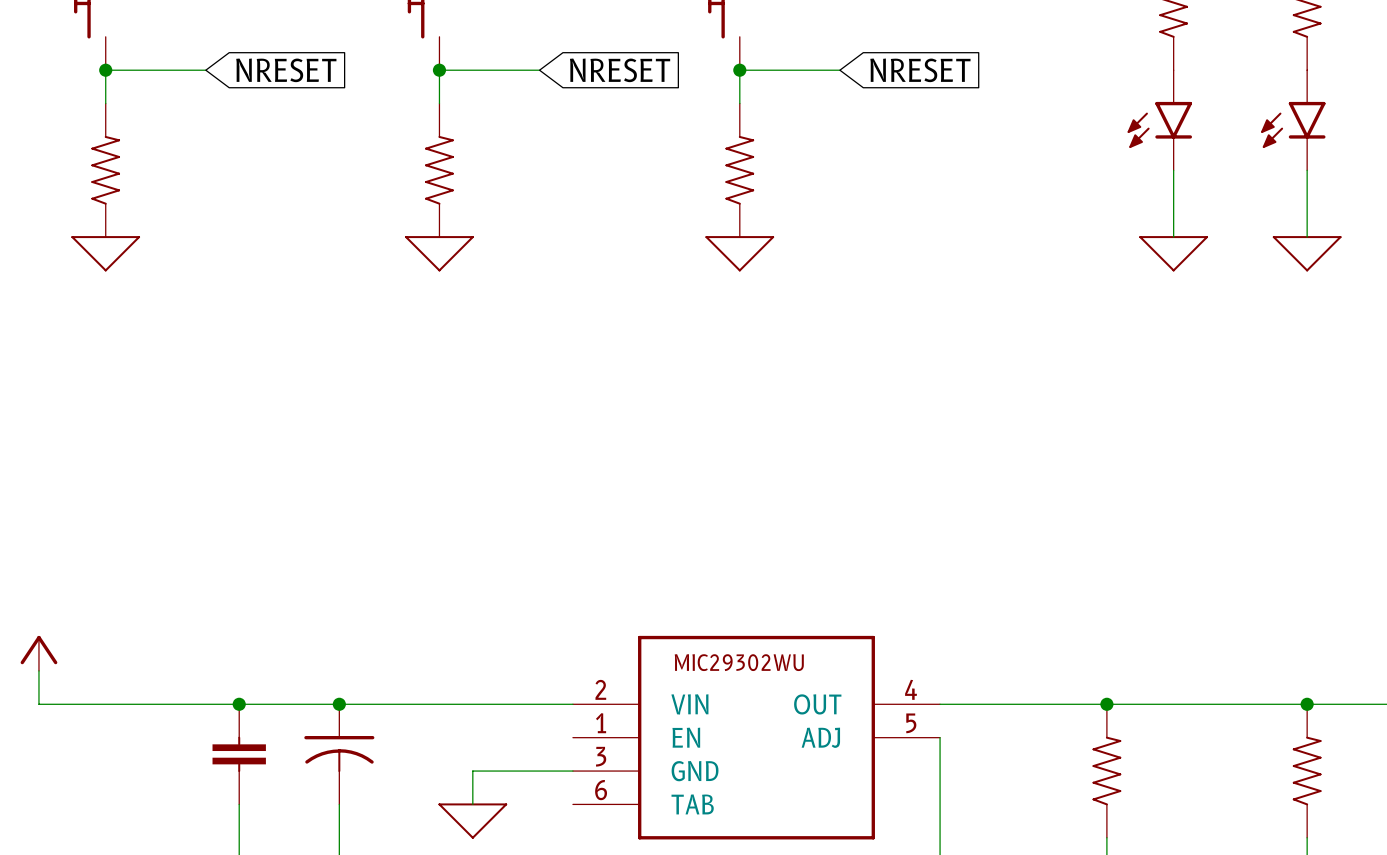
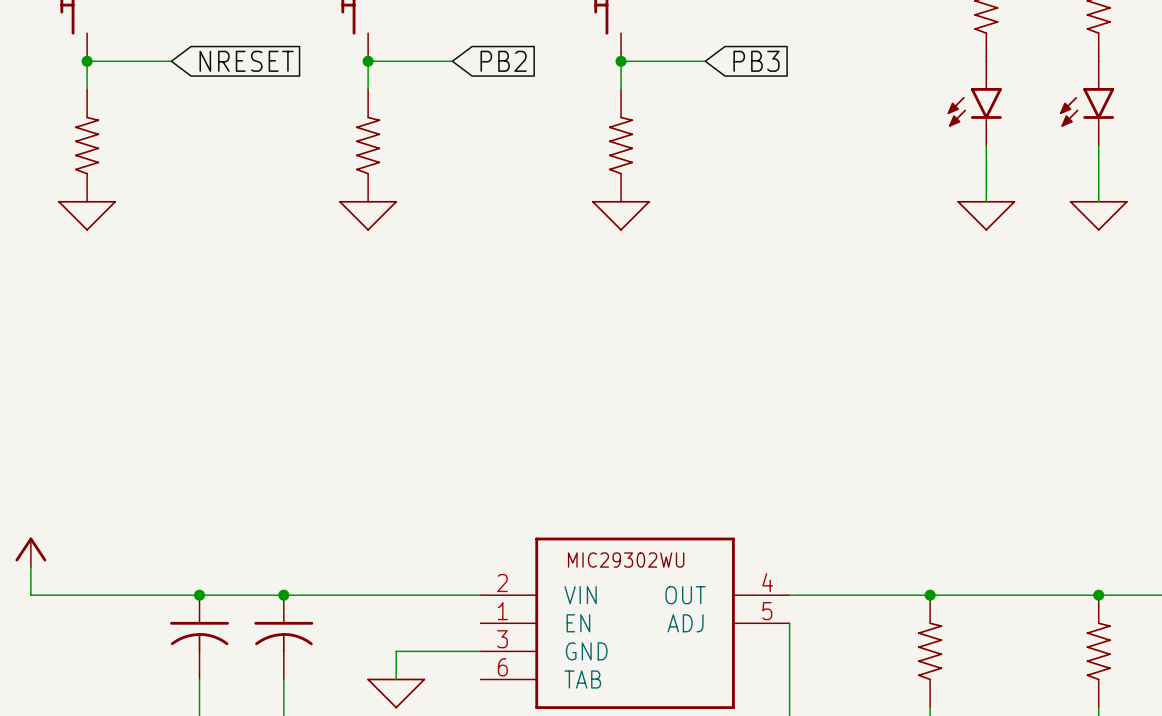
global label: NRESET (620, 70) -> PB2 (503, 61)
global label: NRESET (920, 70) -> PB3 (756, 61)
part symbol: [212, 704, 266, 805] -> [170, 595, 230, 680]

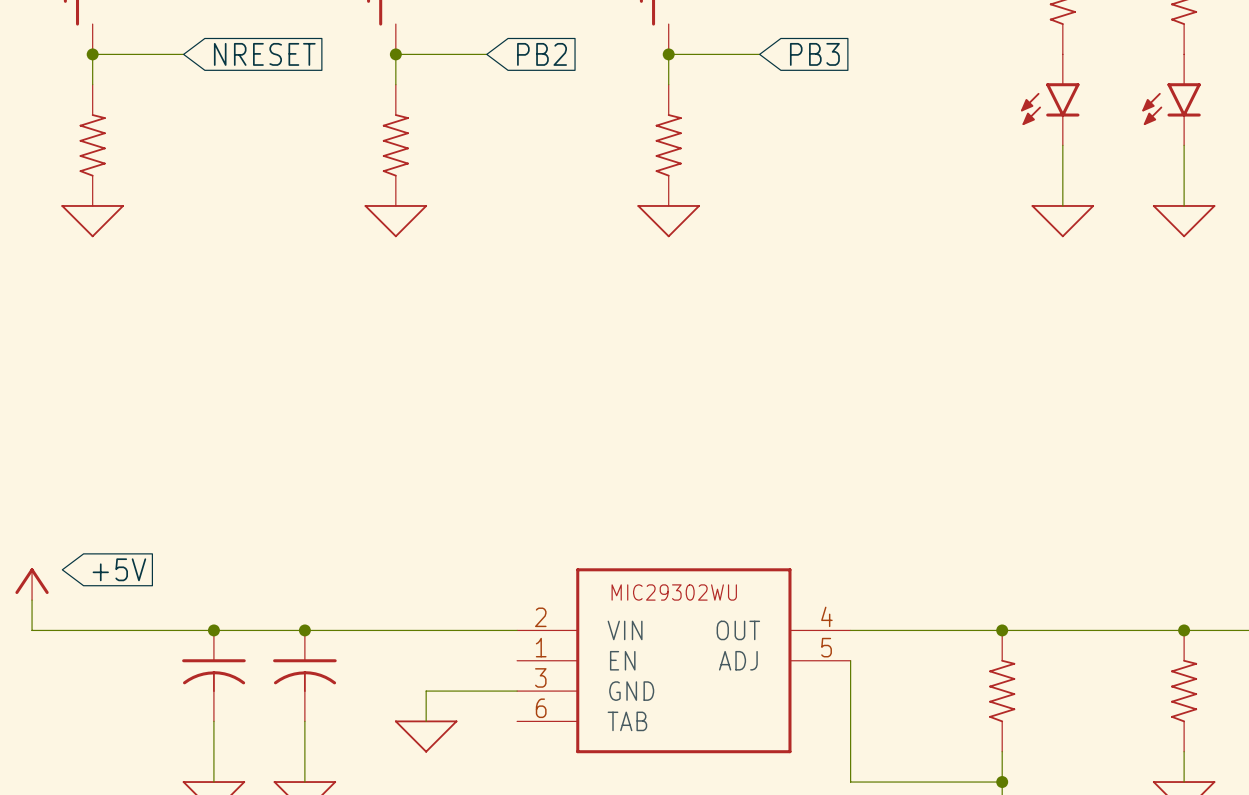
global label: none -> +5V (119, 569)

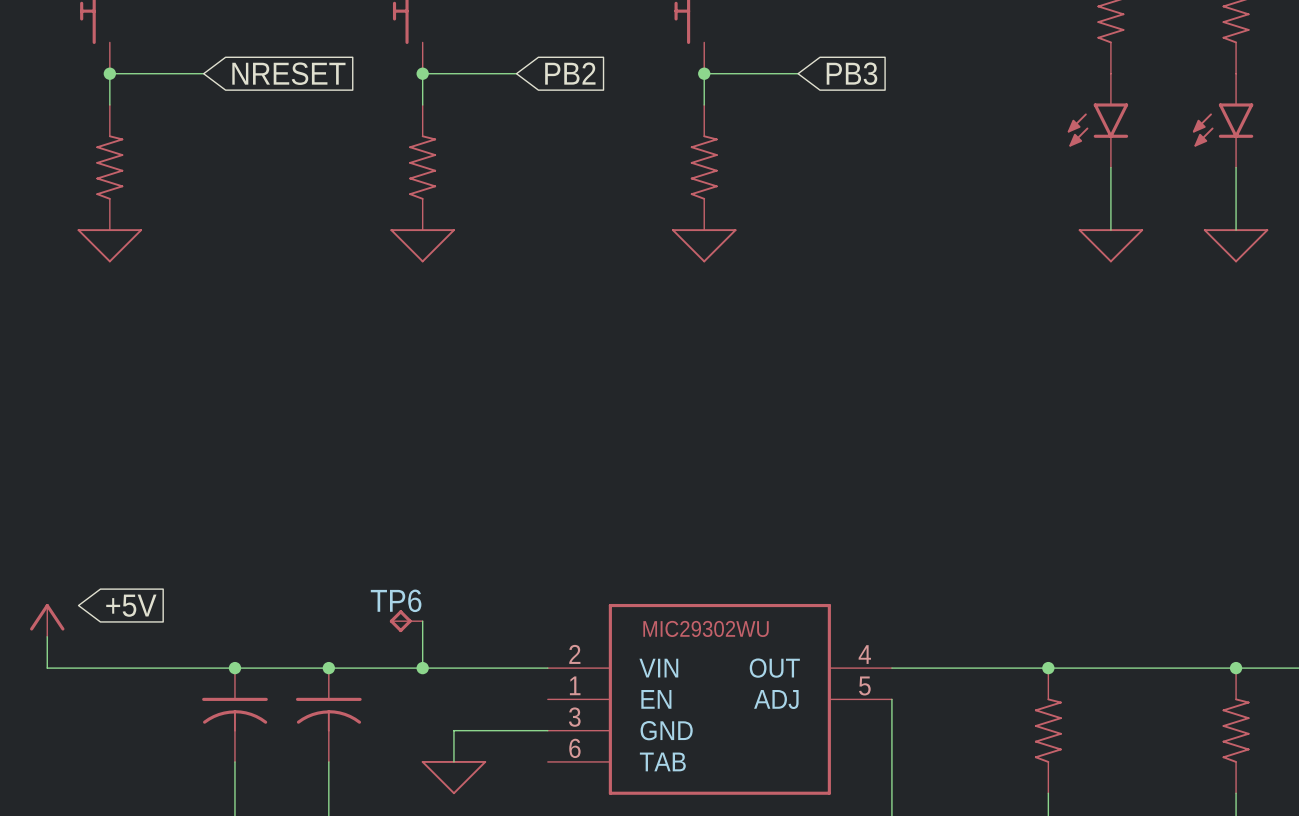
TP6: none -> (406, 621)
wire: none -> (422, 621) (422, 668)
junction: none -> (422, 668)

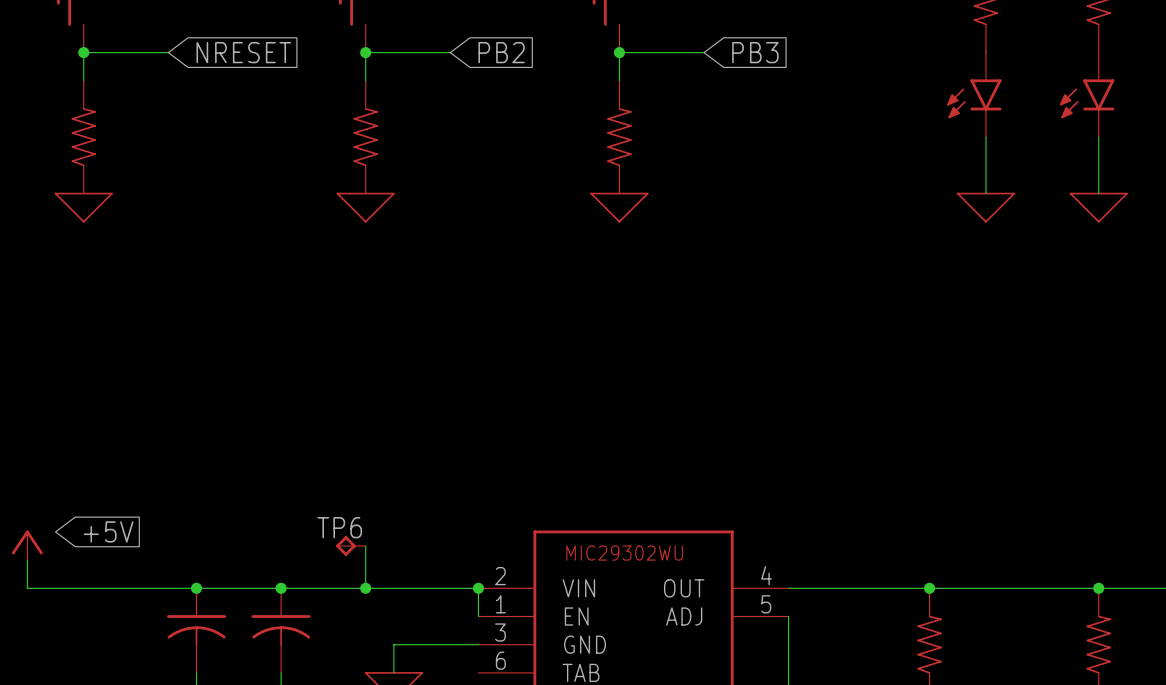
wire: none -> (478, 588) (478, 616)
junction: none -> (478, 588)

